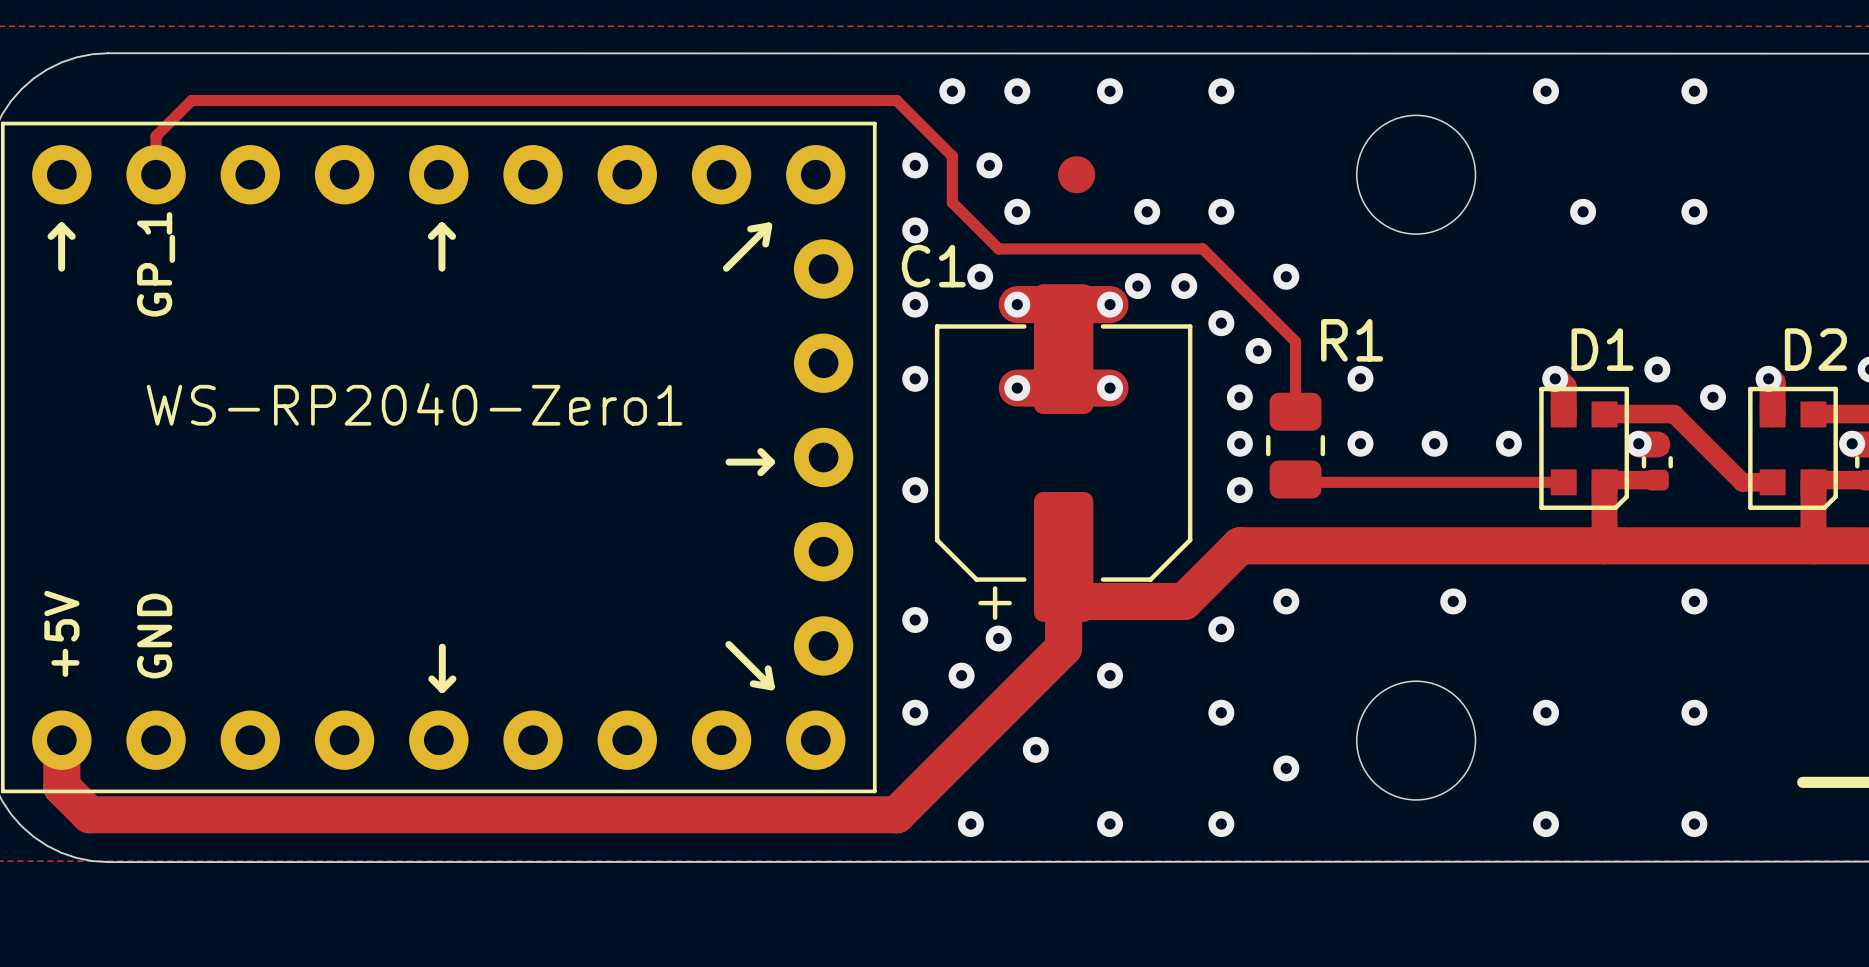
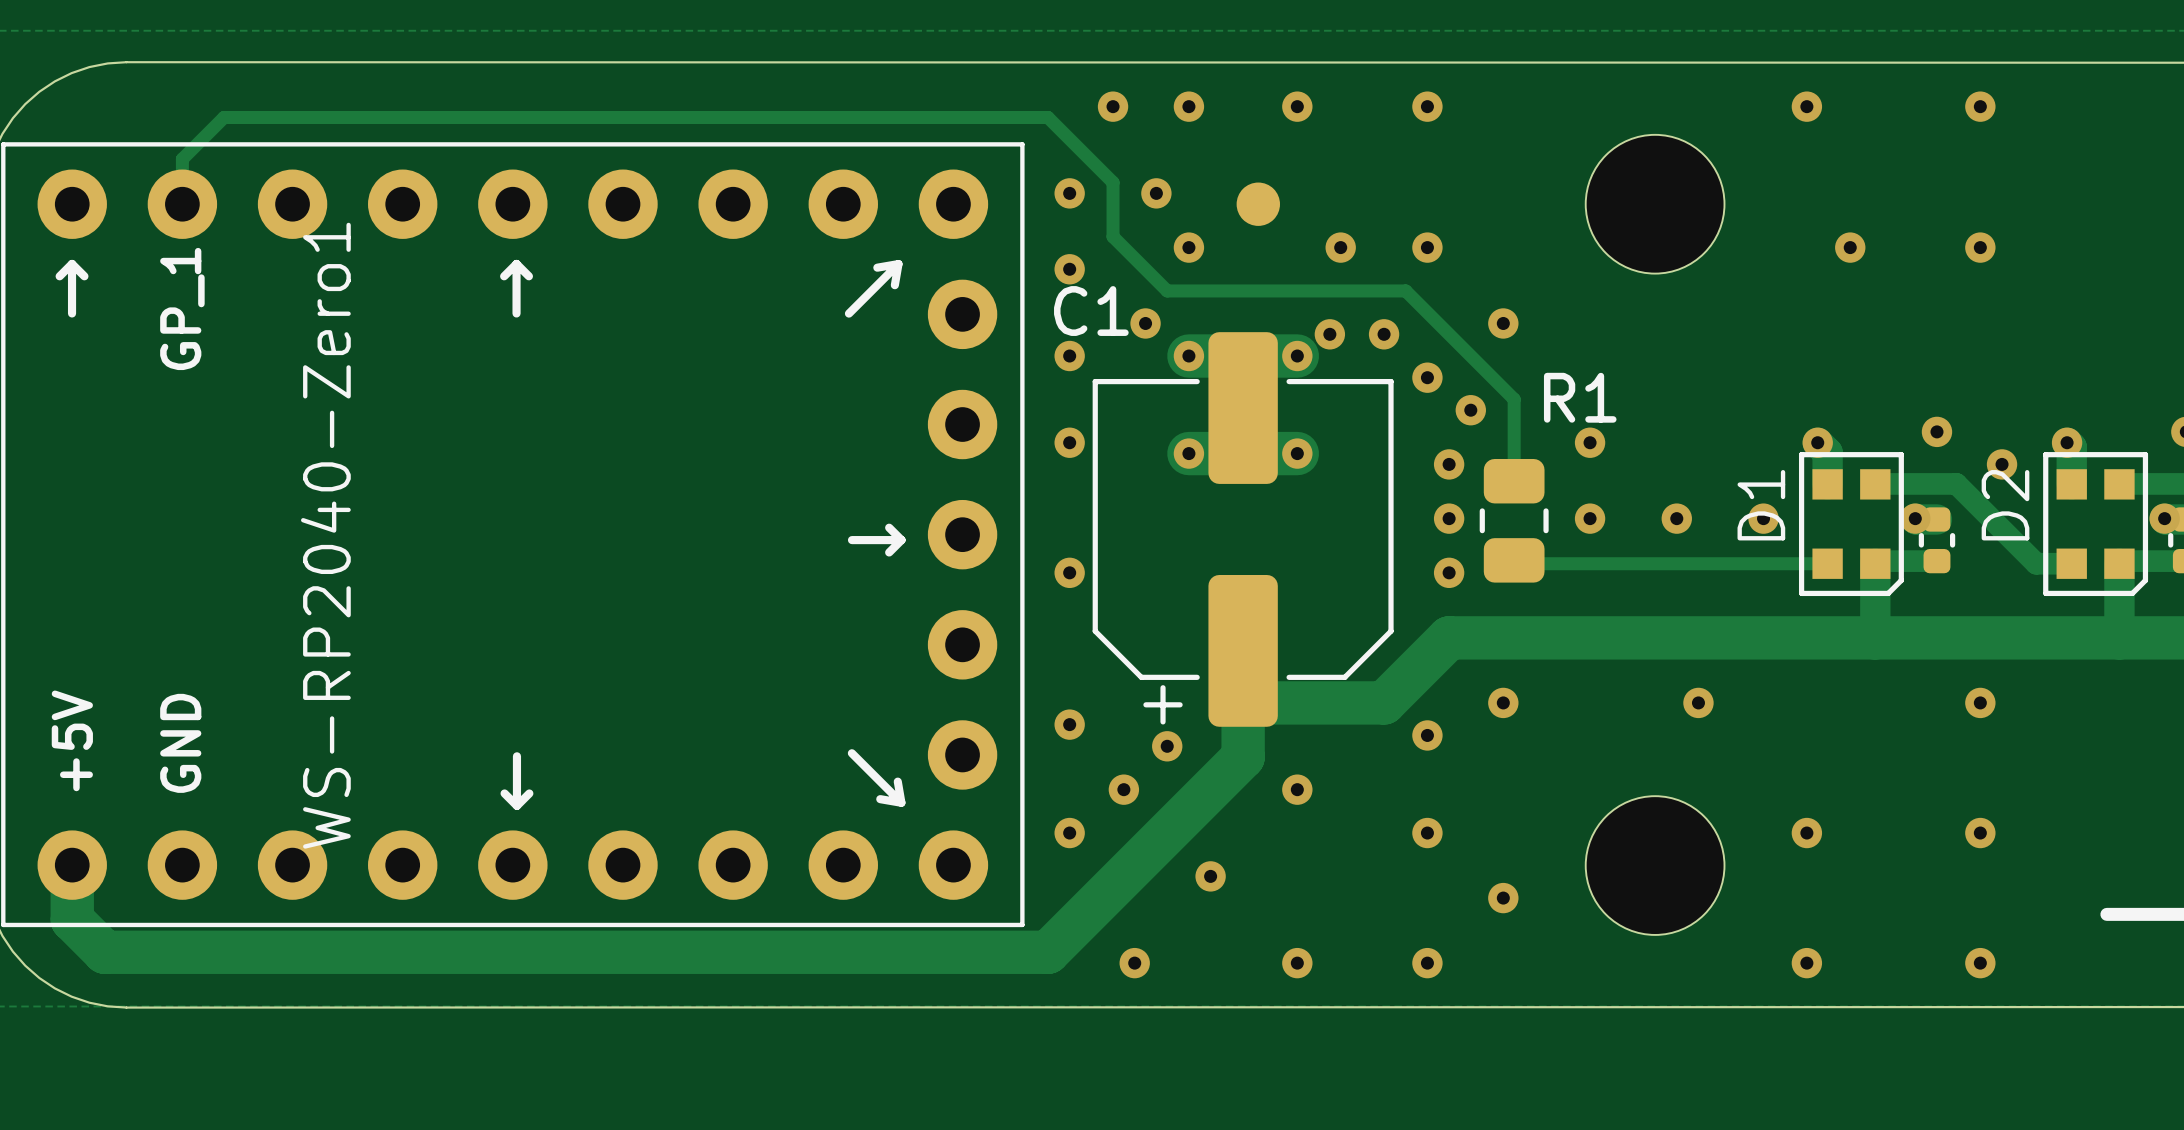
D1 name rotation: 0° (1602, 349) -> 90° counterclockwise (1761, 505)
D1 name position: D1 (1602, 349) -> D1 (1761, 505)
D2 name rotation: 0° (1815, 349) -> 90° counterclockwise (2005, 505)
D2 name position: D2 (1815, 349) -> D2 (2005, 505)
WS-RP2040-Zero1 name rotation: 0° (414, 404) -> 90° counterclockwise (325, 535)

